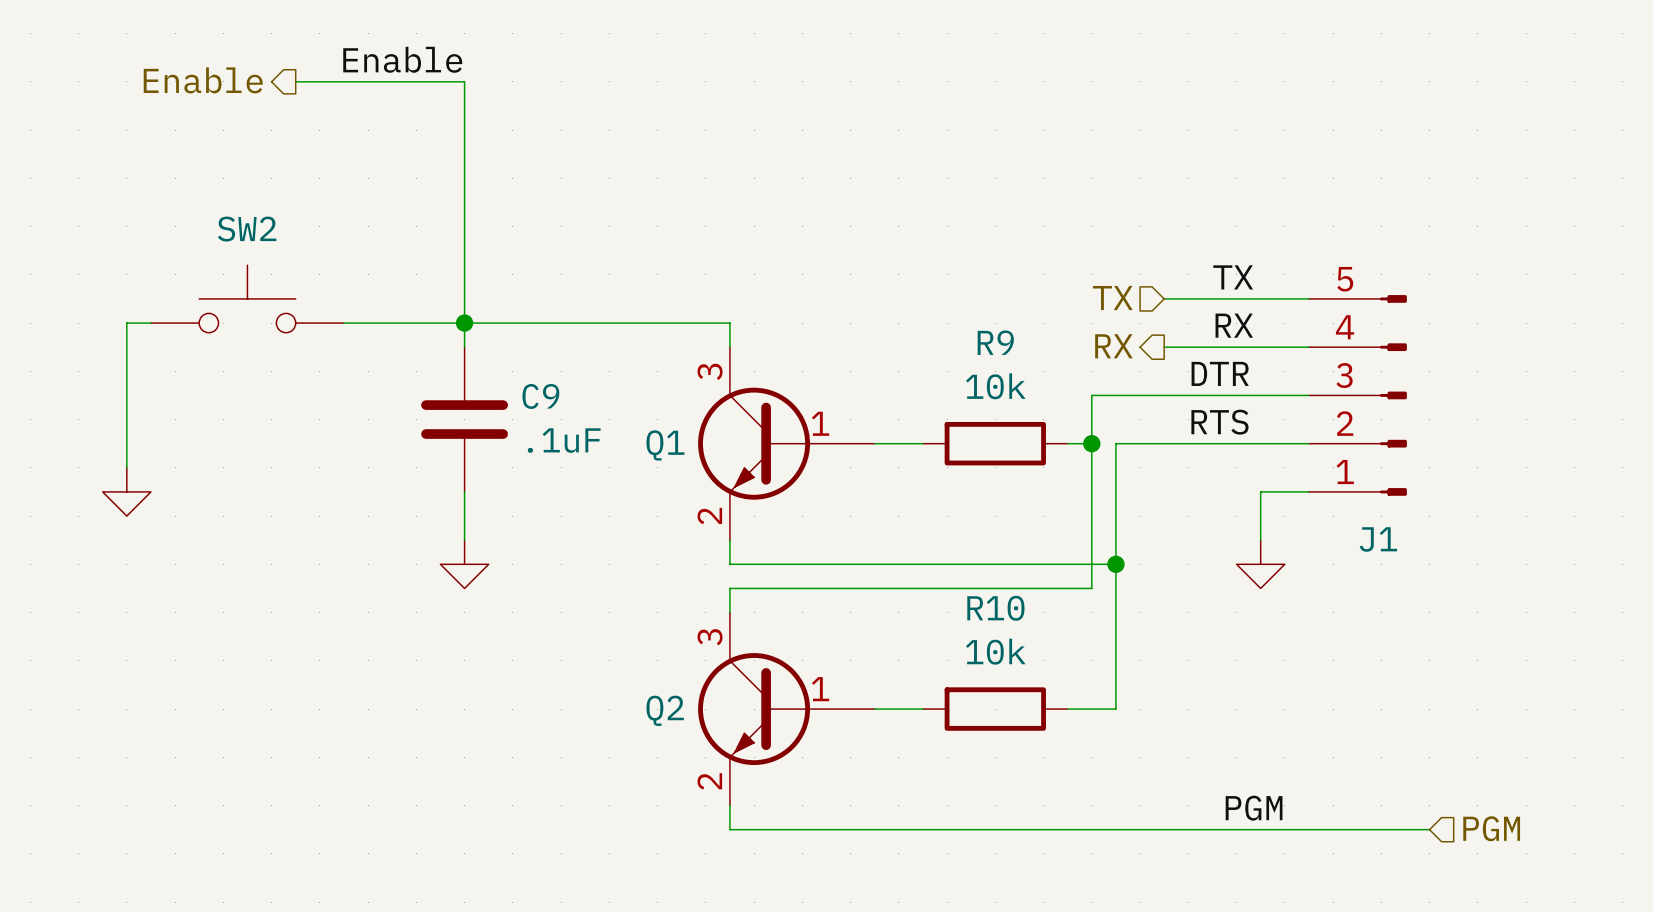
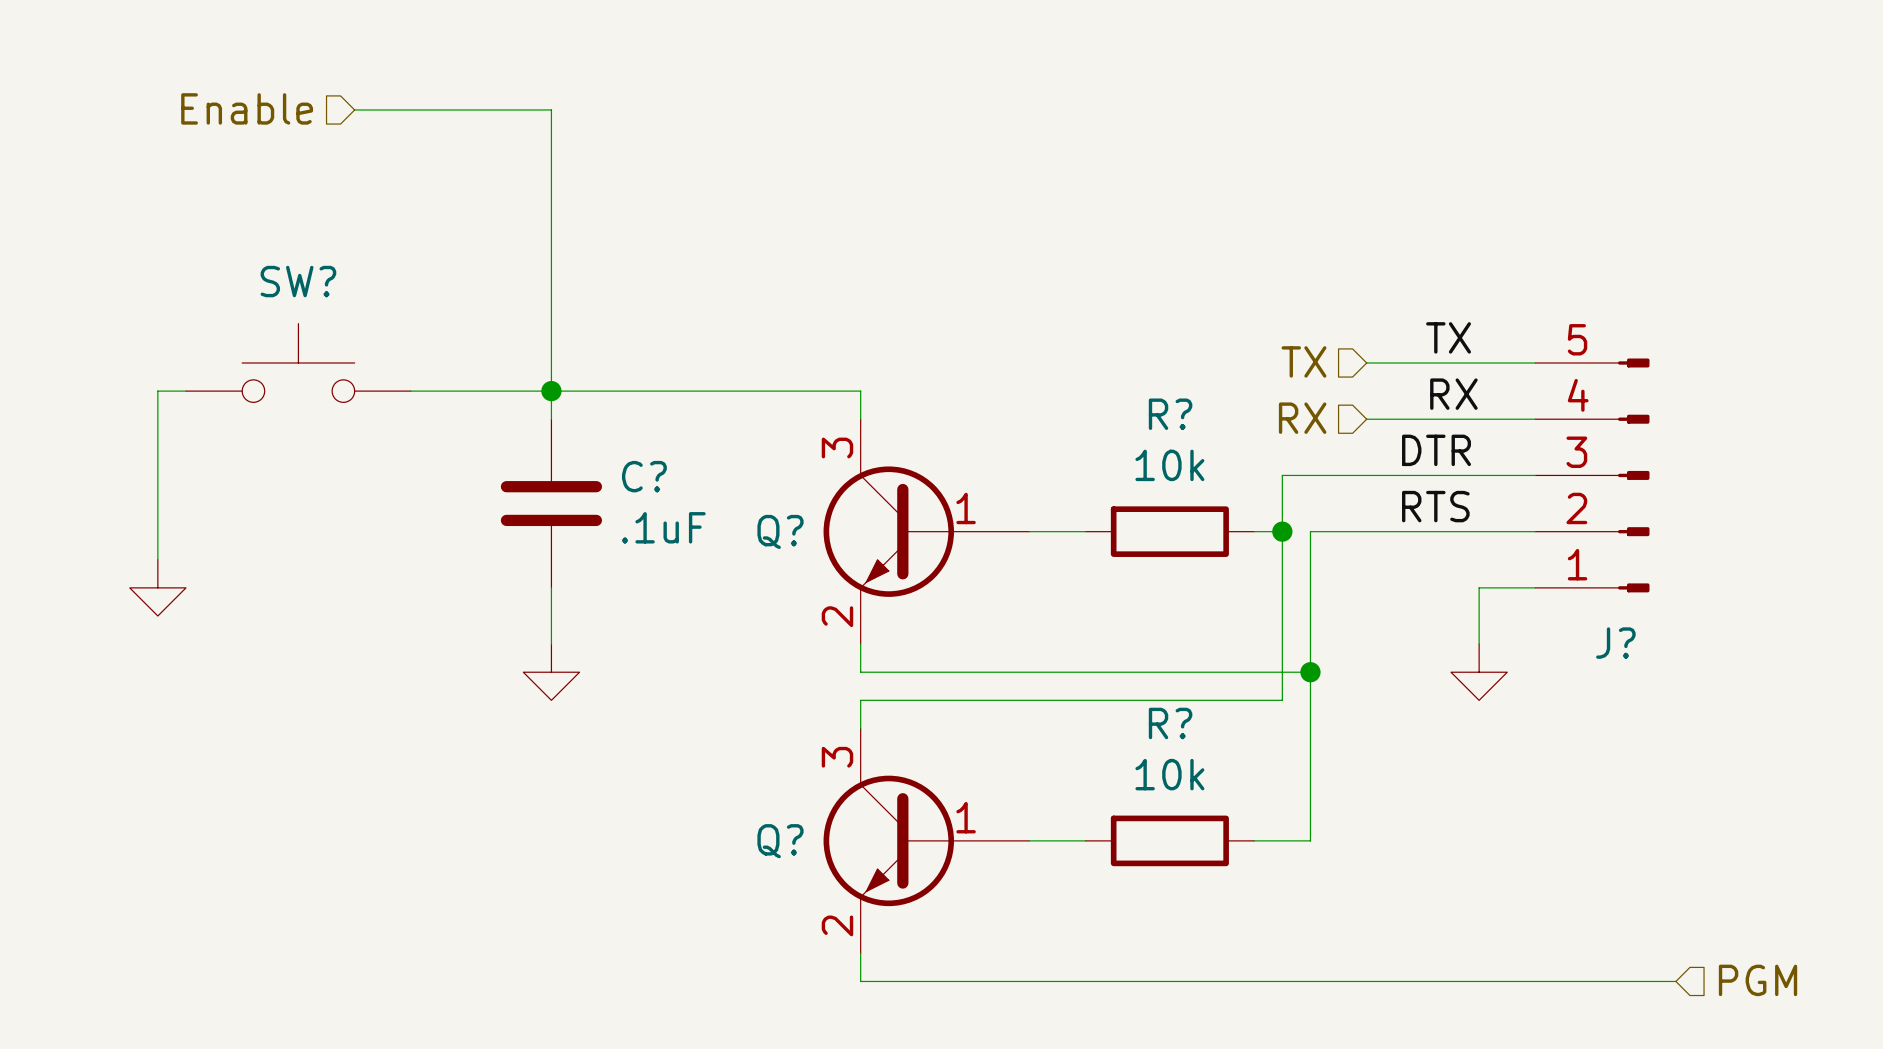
label: Enable (402, 59) -> none
hierarchical label shape: output (203, 80) -> input (247, 108)
SW2 name: SW2 (247, 229) -> SW? (298, 281)
R9 name: R9 (995, 342) -> R? (1170, 414)
hierarchical label shape: output (1113, 346) -> input (1302, 418)
C9 name: C9 (540, 396) -> C? (644, 476)
Q1 name: Q1 (665, 445) -> Q? (780, 531)
J1 name: J1 (1378, 539) -> J? (1615, 643)
R10 name: R10 (995, 608) -> R? (1170, 723)
Q2 name: Q2 (665, 710) -> Q? (780, 841)
label: PGM (1254, 808) -> none

